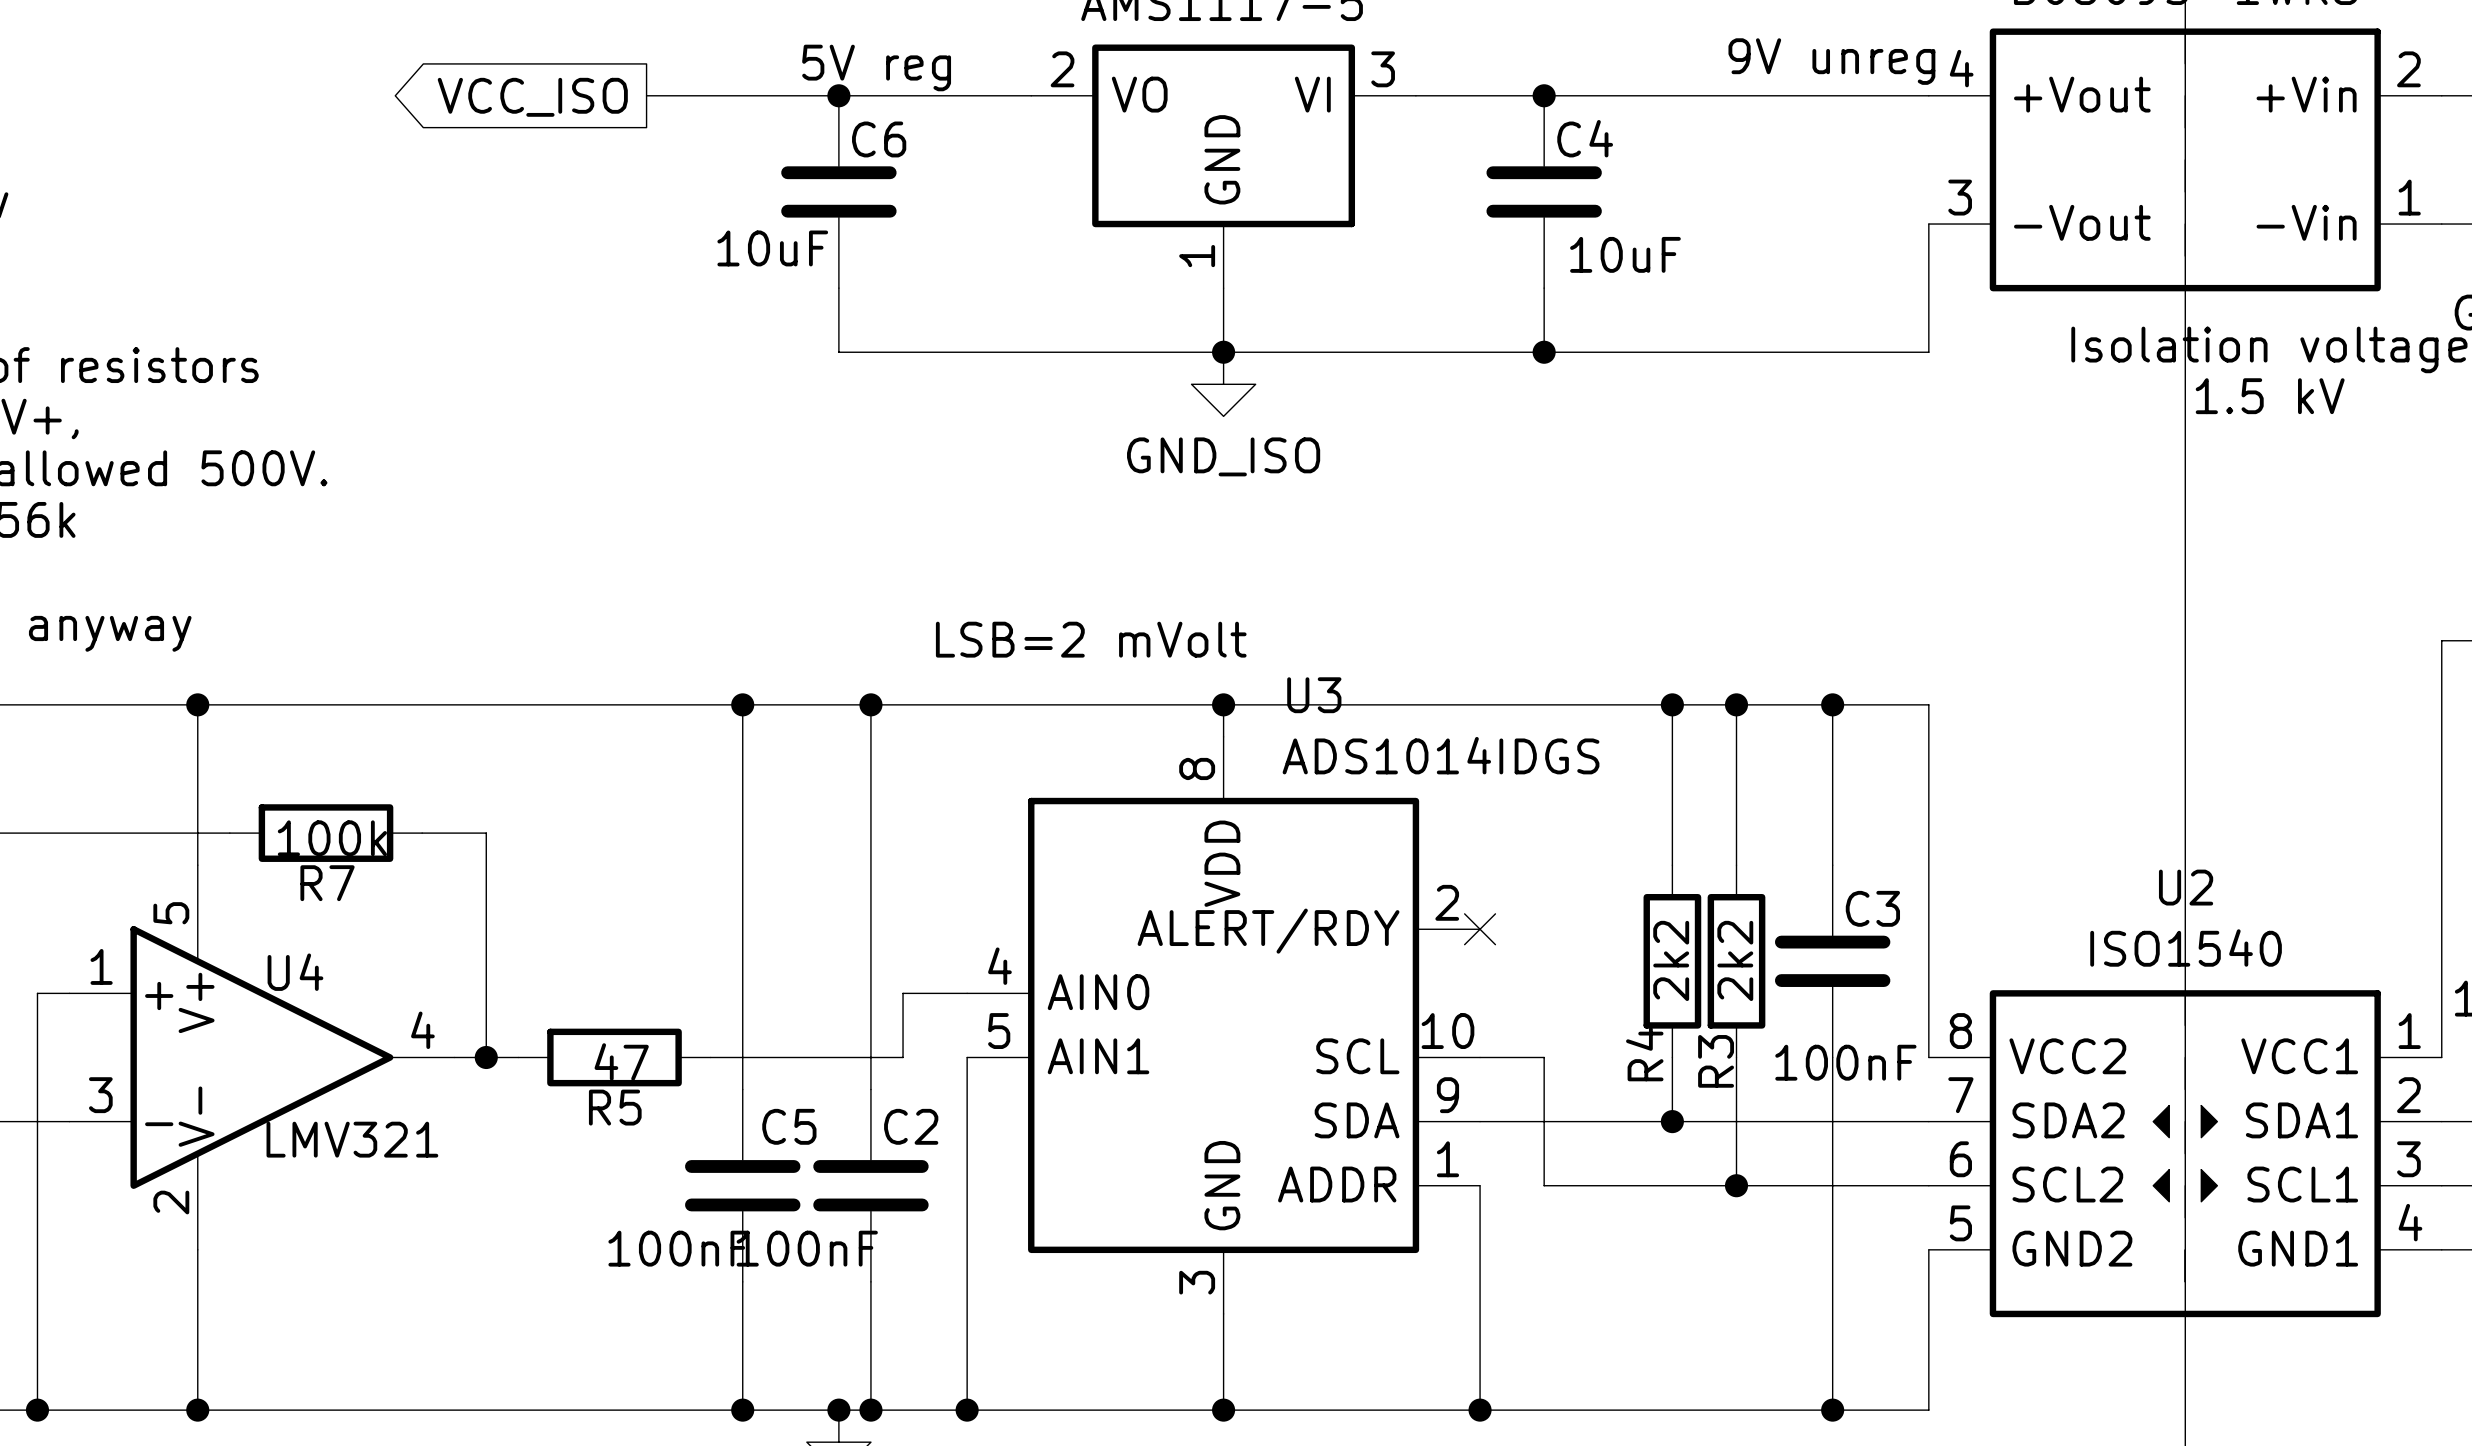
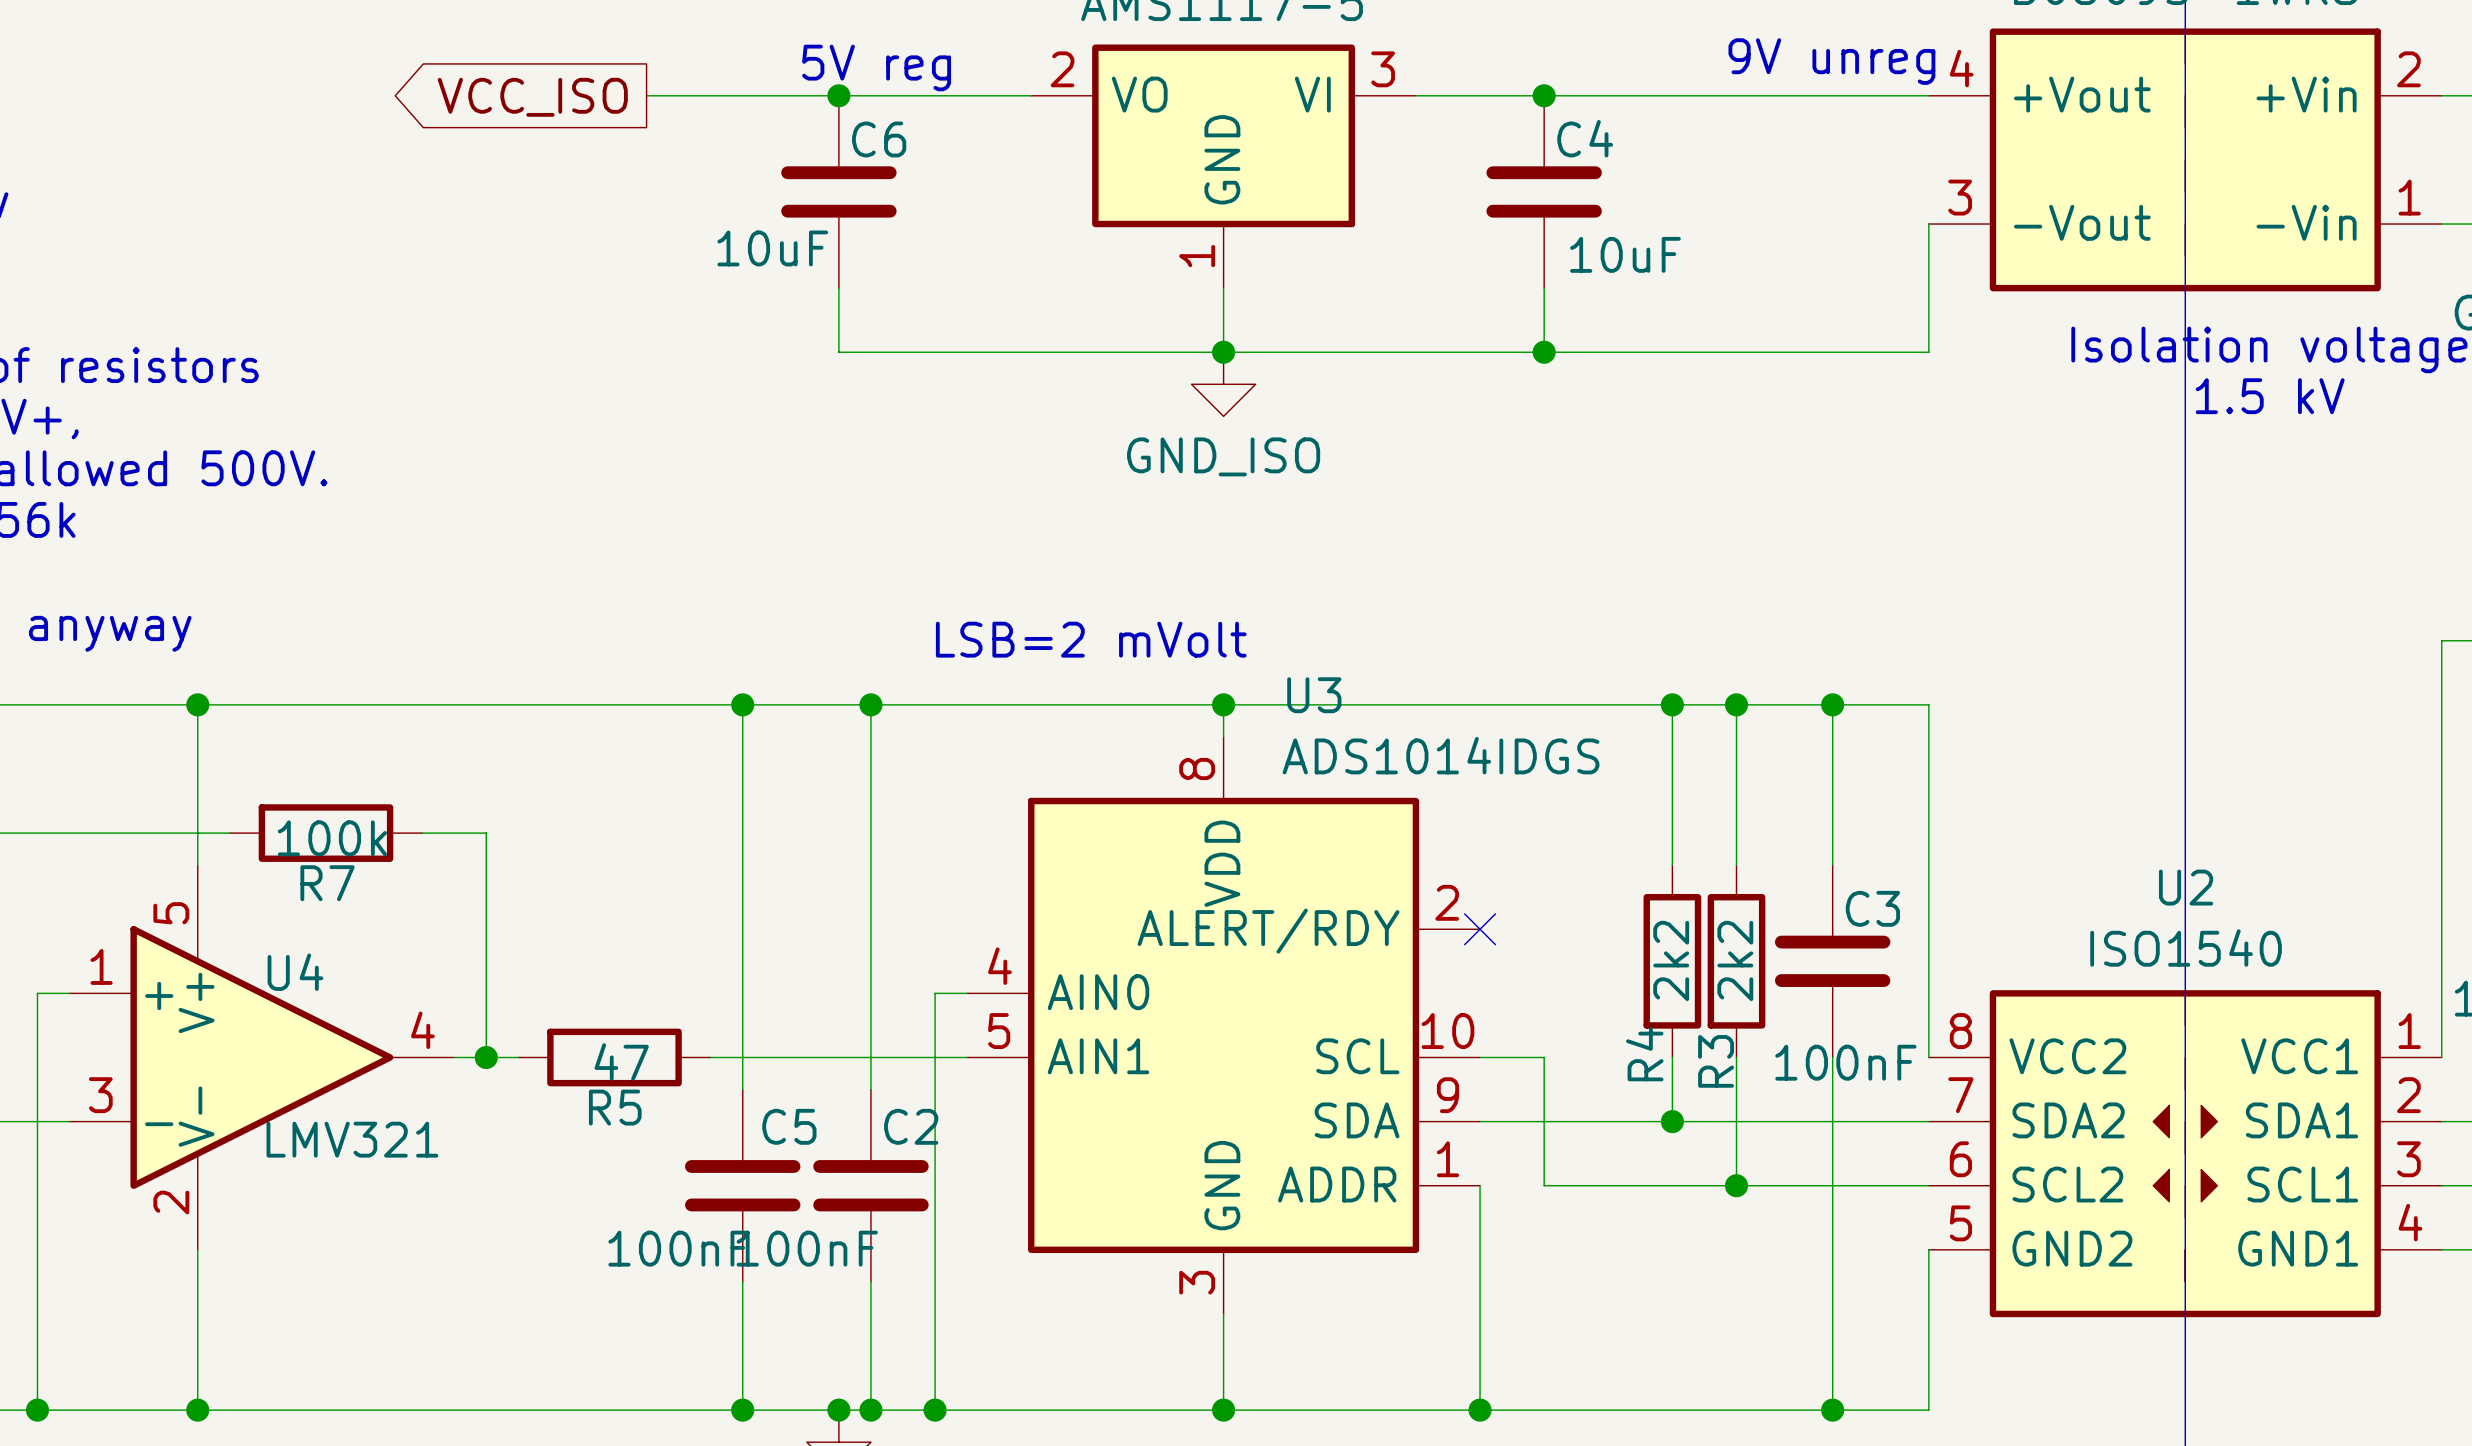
wire: (935, 993) (903, 993) (903, 1057) -> (967, 1057) (903, 1057)
wire: none -> (935, 993) (935, 1410)
wire: (967, 1057) (967, 1410) -> none
junction position: (967, 1410) -> (935, 1410)

